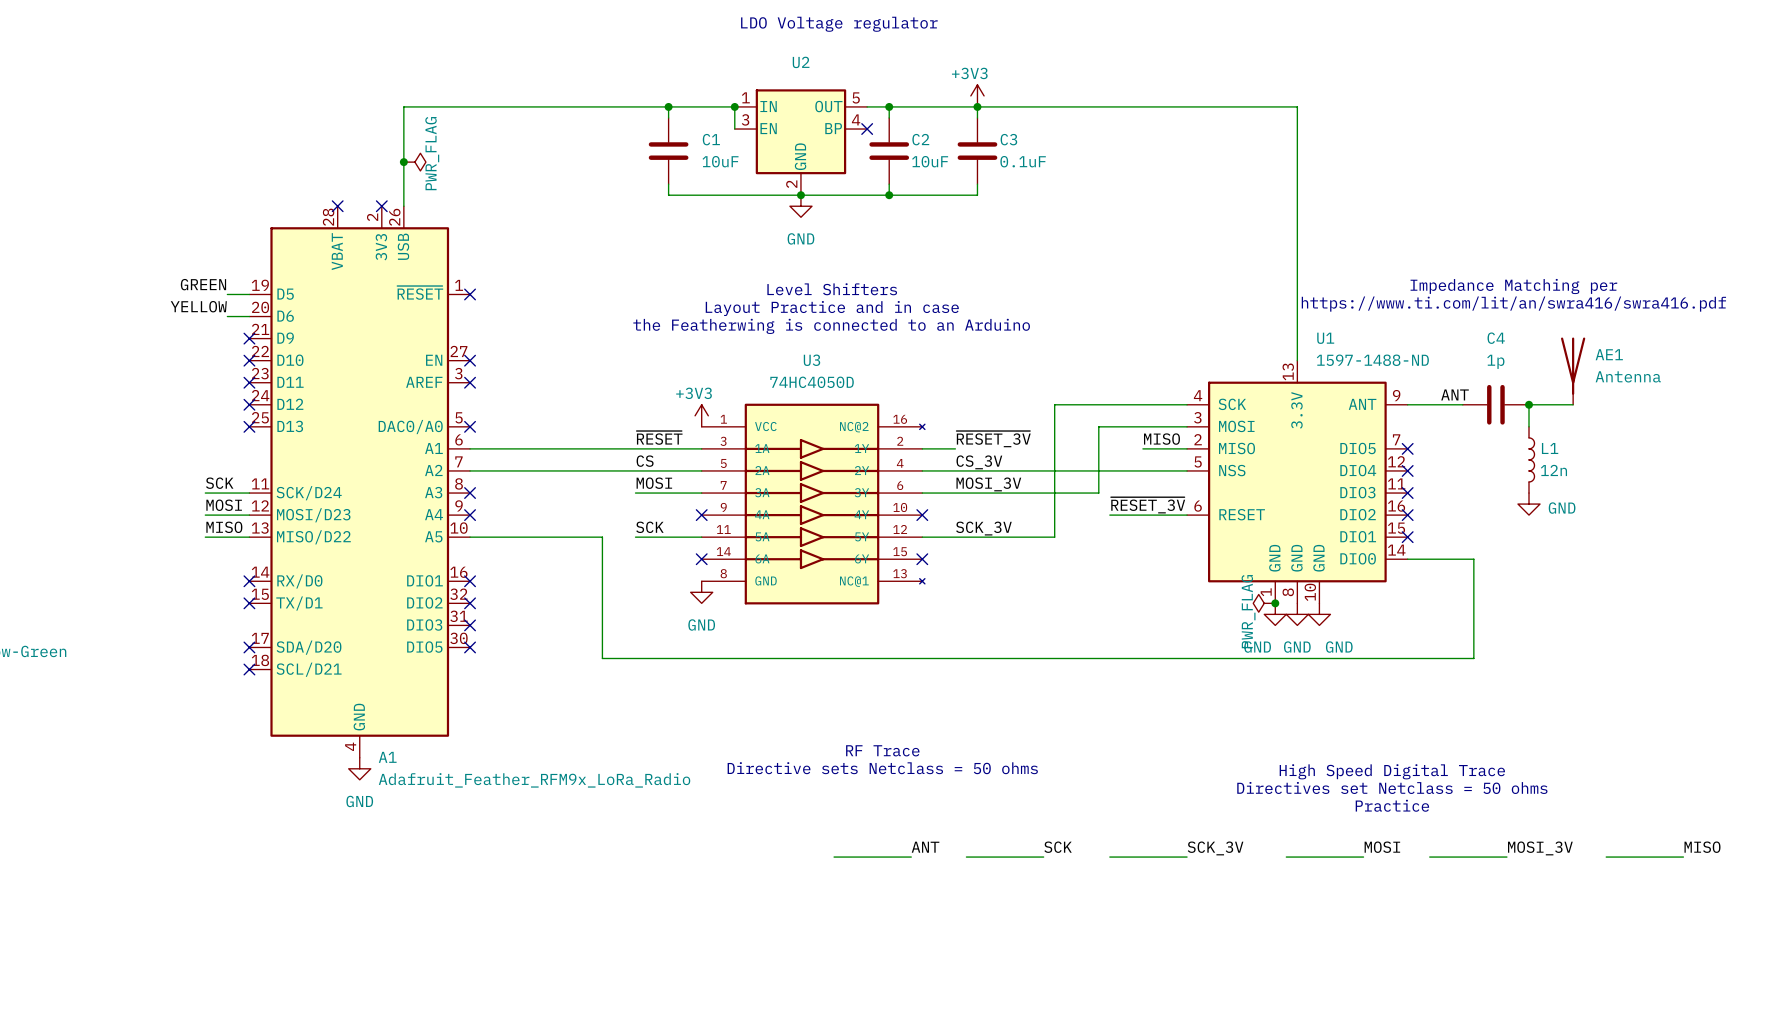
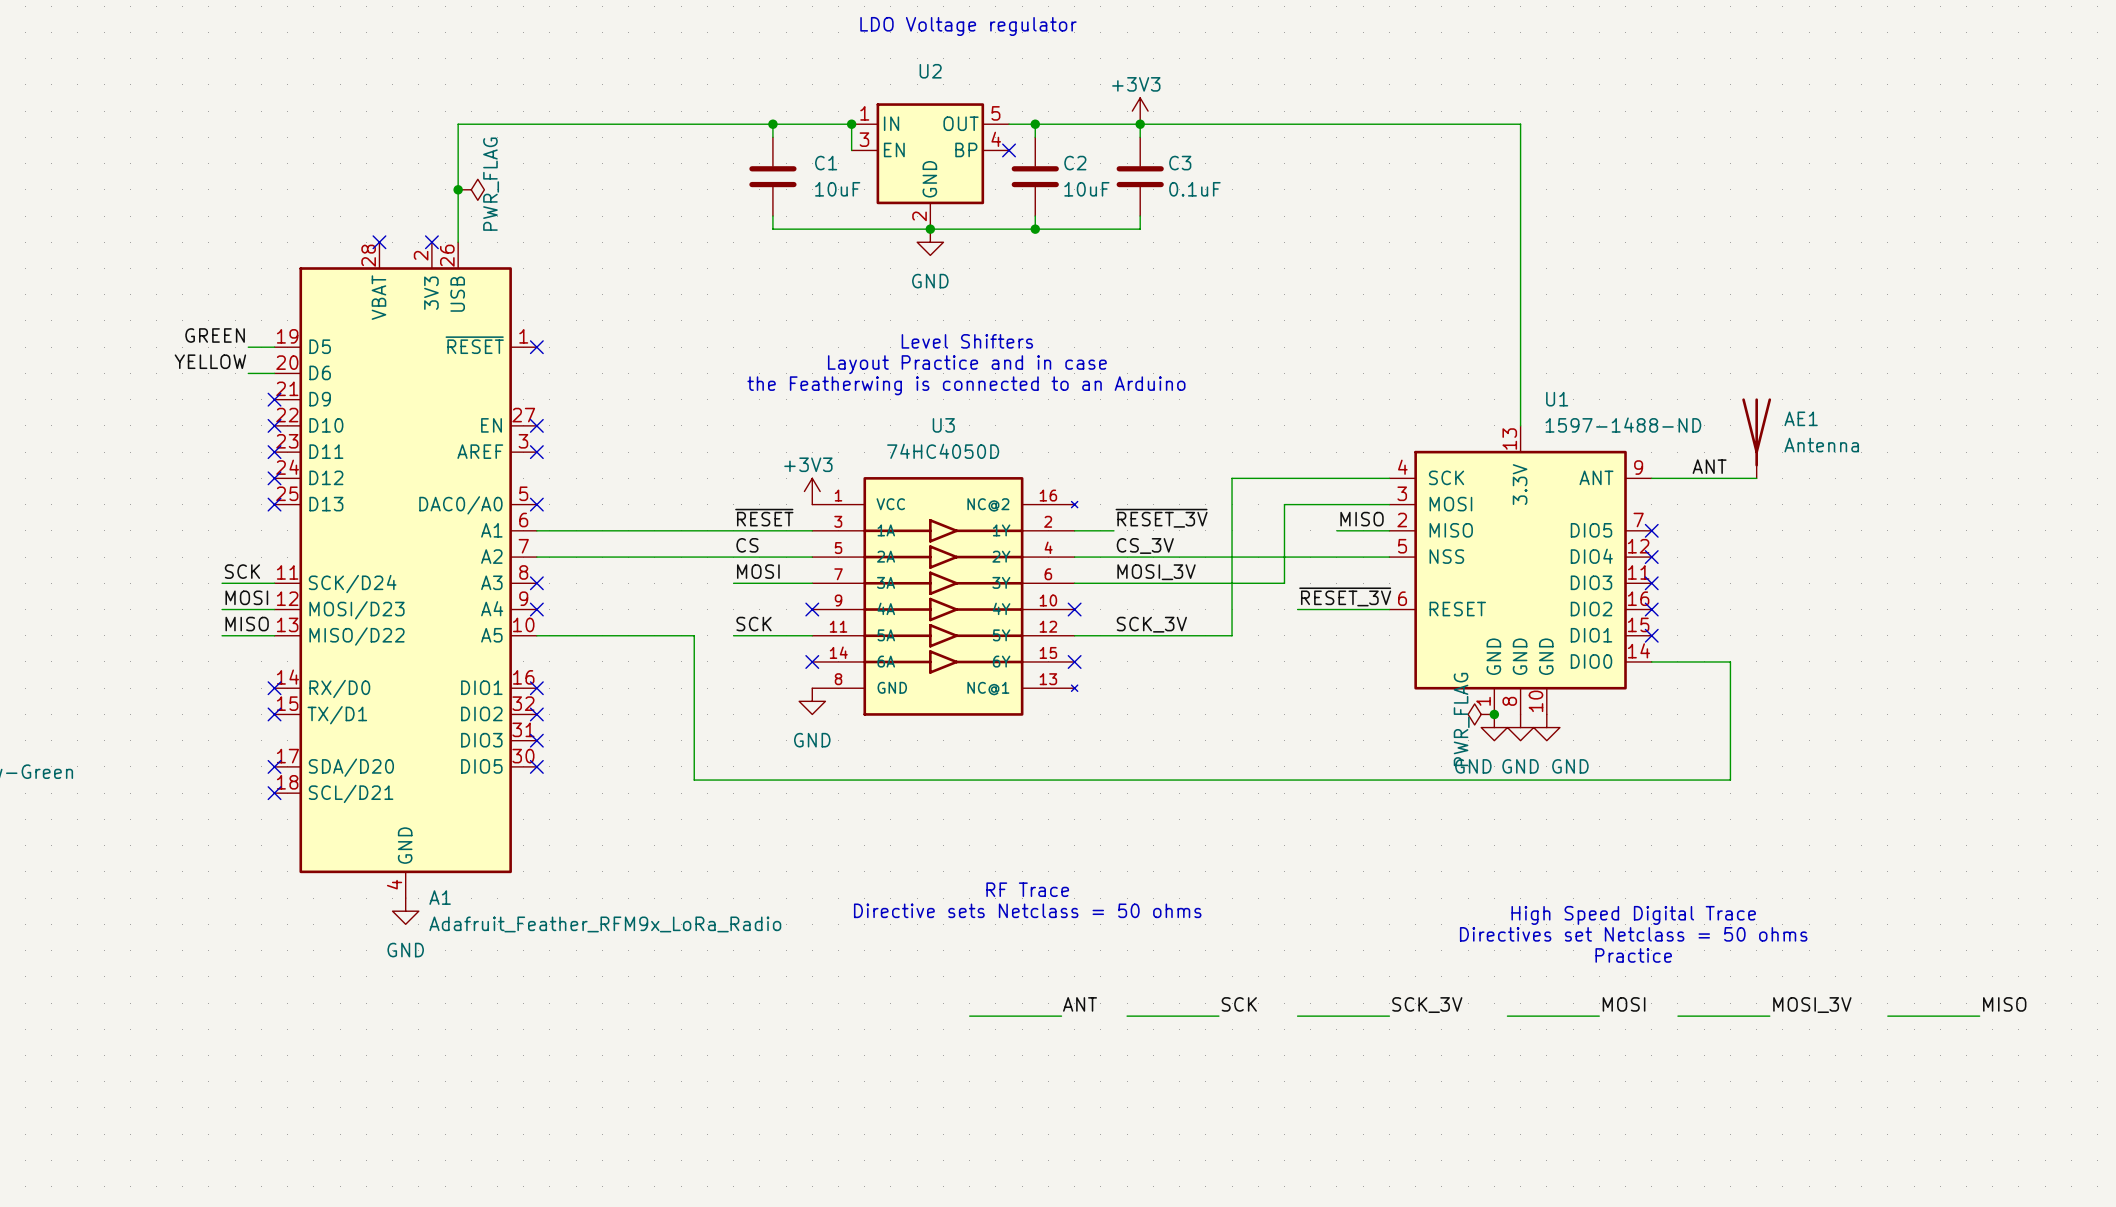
text: Impedance Matching per (1513, 286) -> none
text: https://www.ti.com/lit/an/swra416/swra416.pdf (1513, 304) -> none
AE1 position: (1573, 371) -> (1756, 438)
C4: 1p (1495, 404) -> none
junction: (1529, 404) -> none
wire: (1573, 404) (1529, 404) (1529, 426) -> none
L1: 12n (1531, 459) -> none
power symbol: GND (1529, 504) -> none

